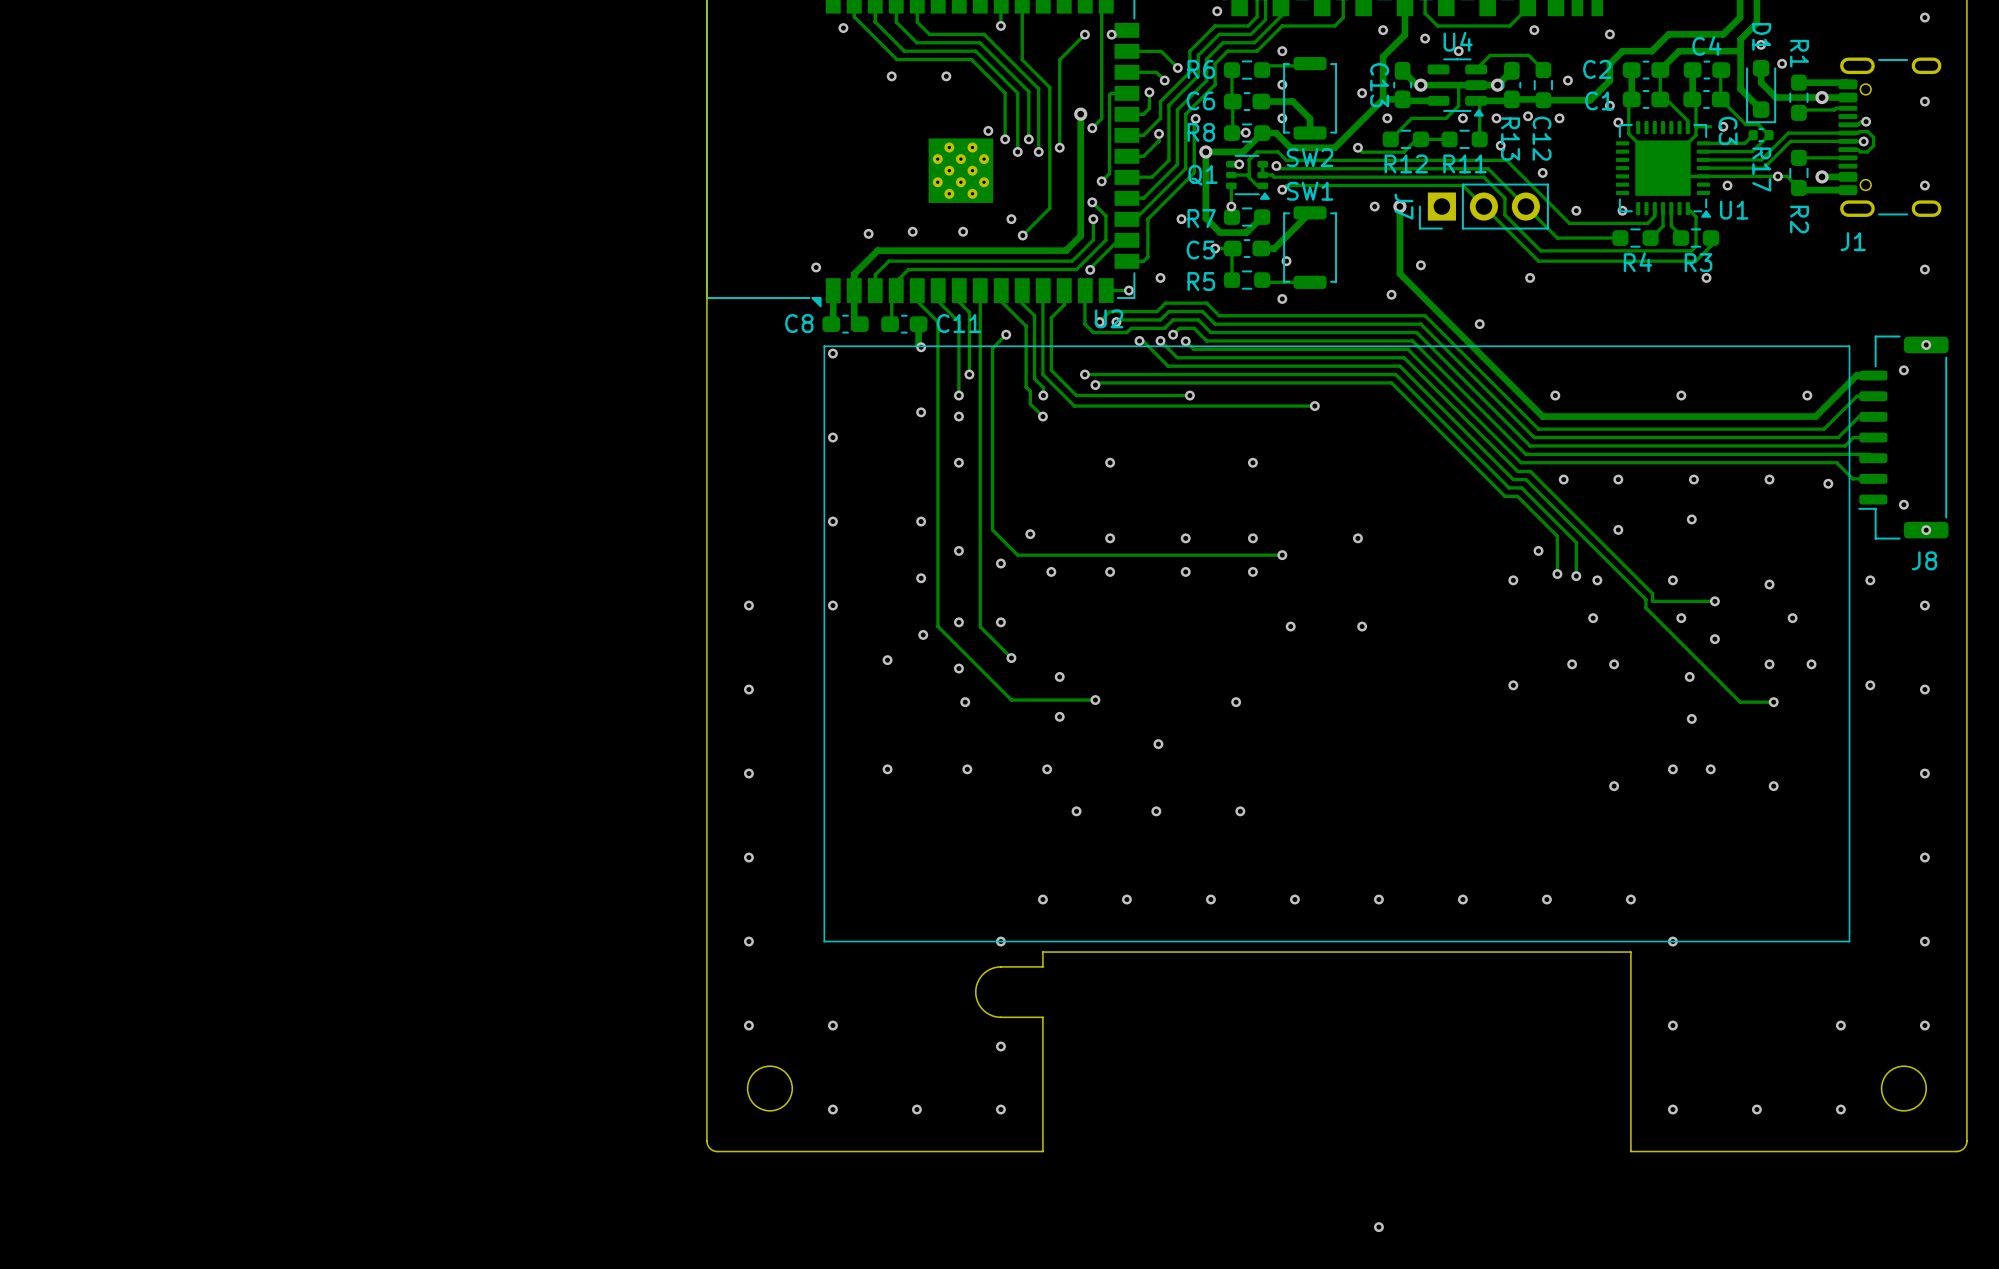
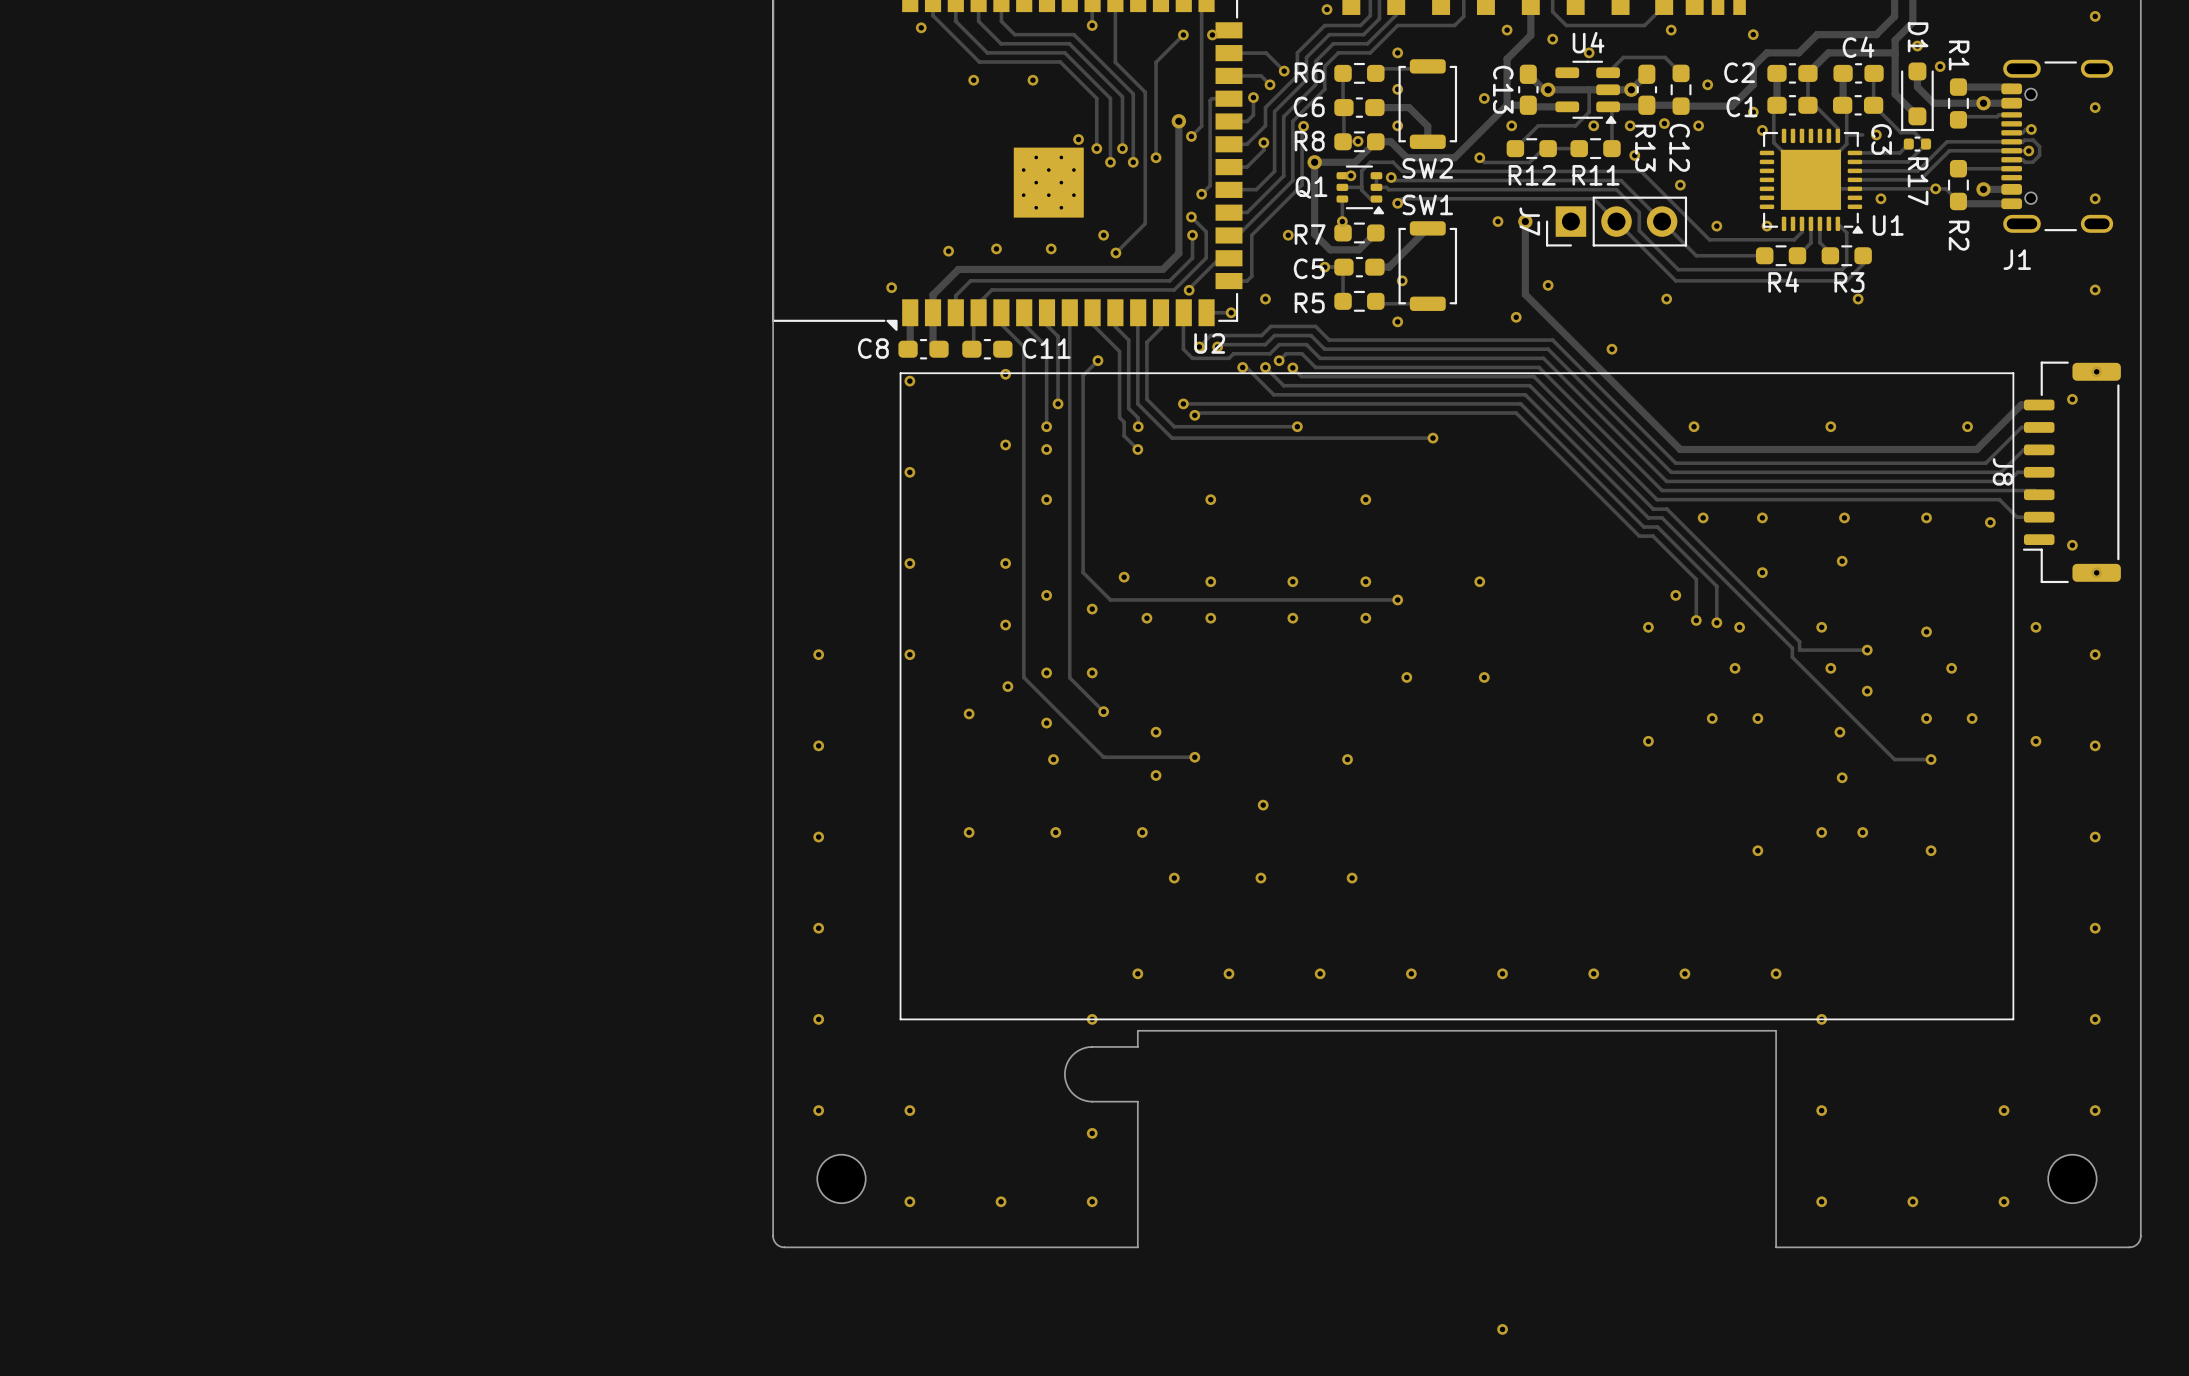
track: (918, 324) (918, 344) (921, 347) -> none
J8 name rotation: 0° (1924, 560) -> 90° clockwise (2003, 471)
J8 name position: J8 (1924, 560) -> J8 (2003, 471)

